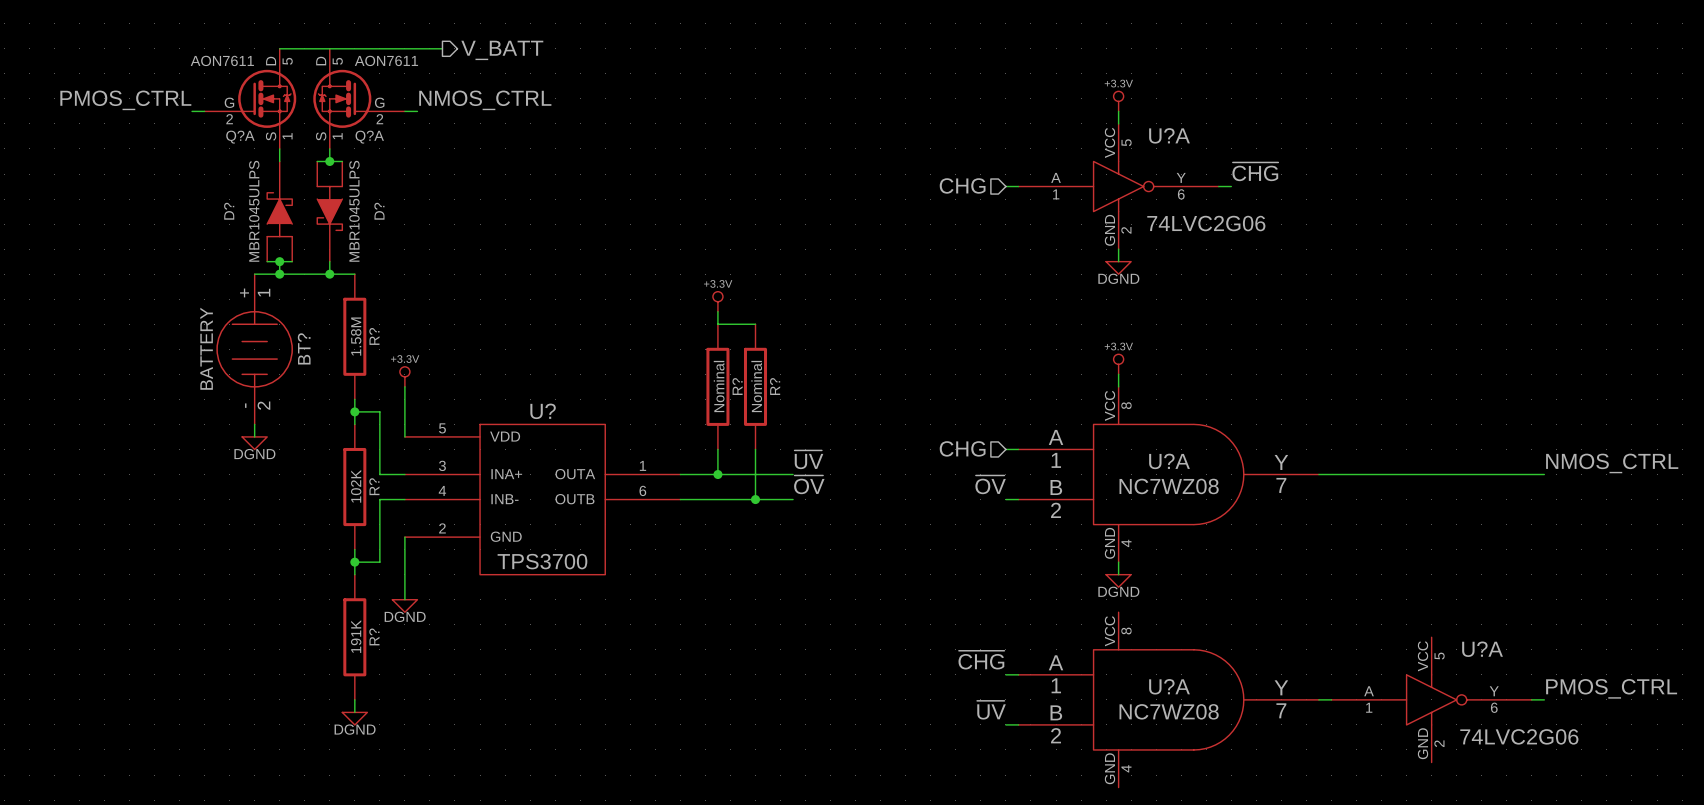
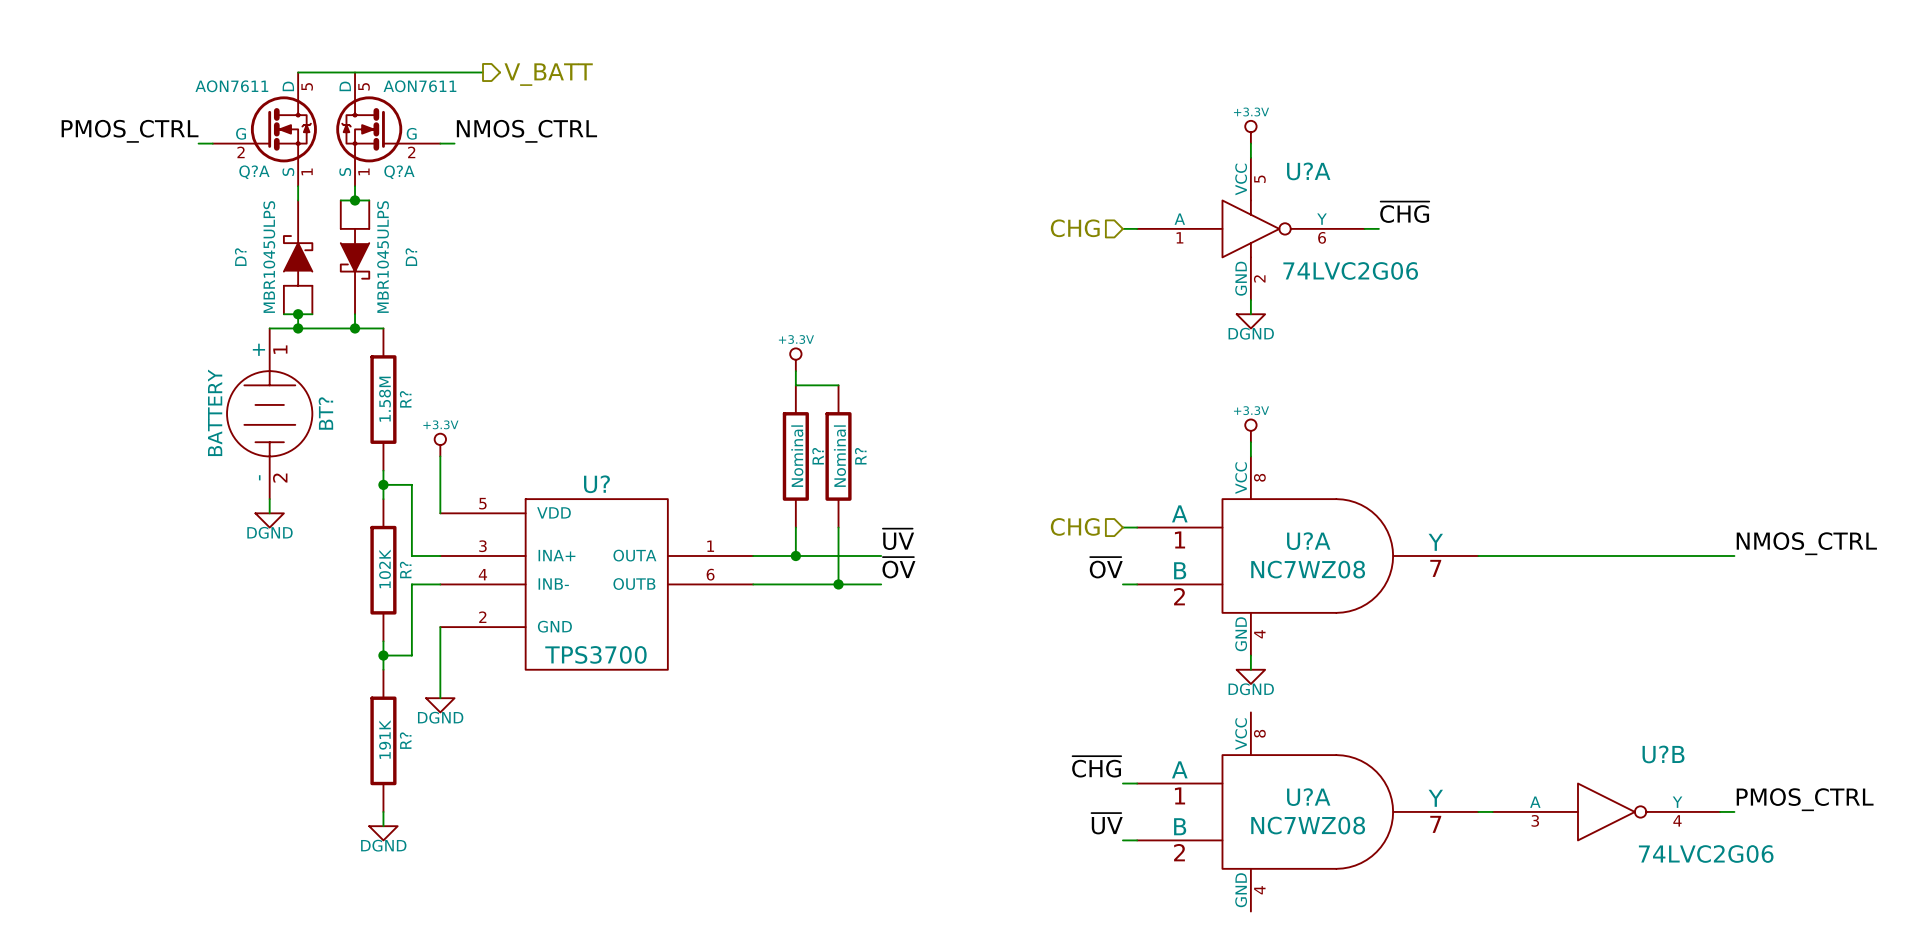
U?A: 74LVC2G06 (1431, 699) -> none
U?B: none -> 74LVC2G06 (1606, 811)

